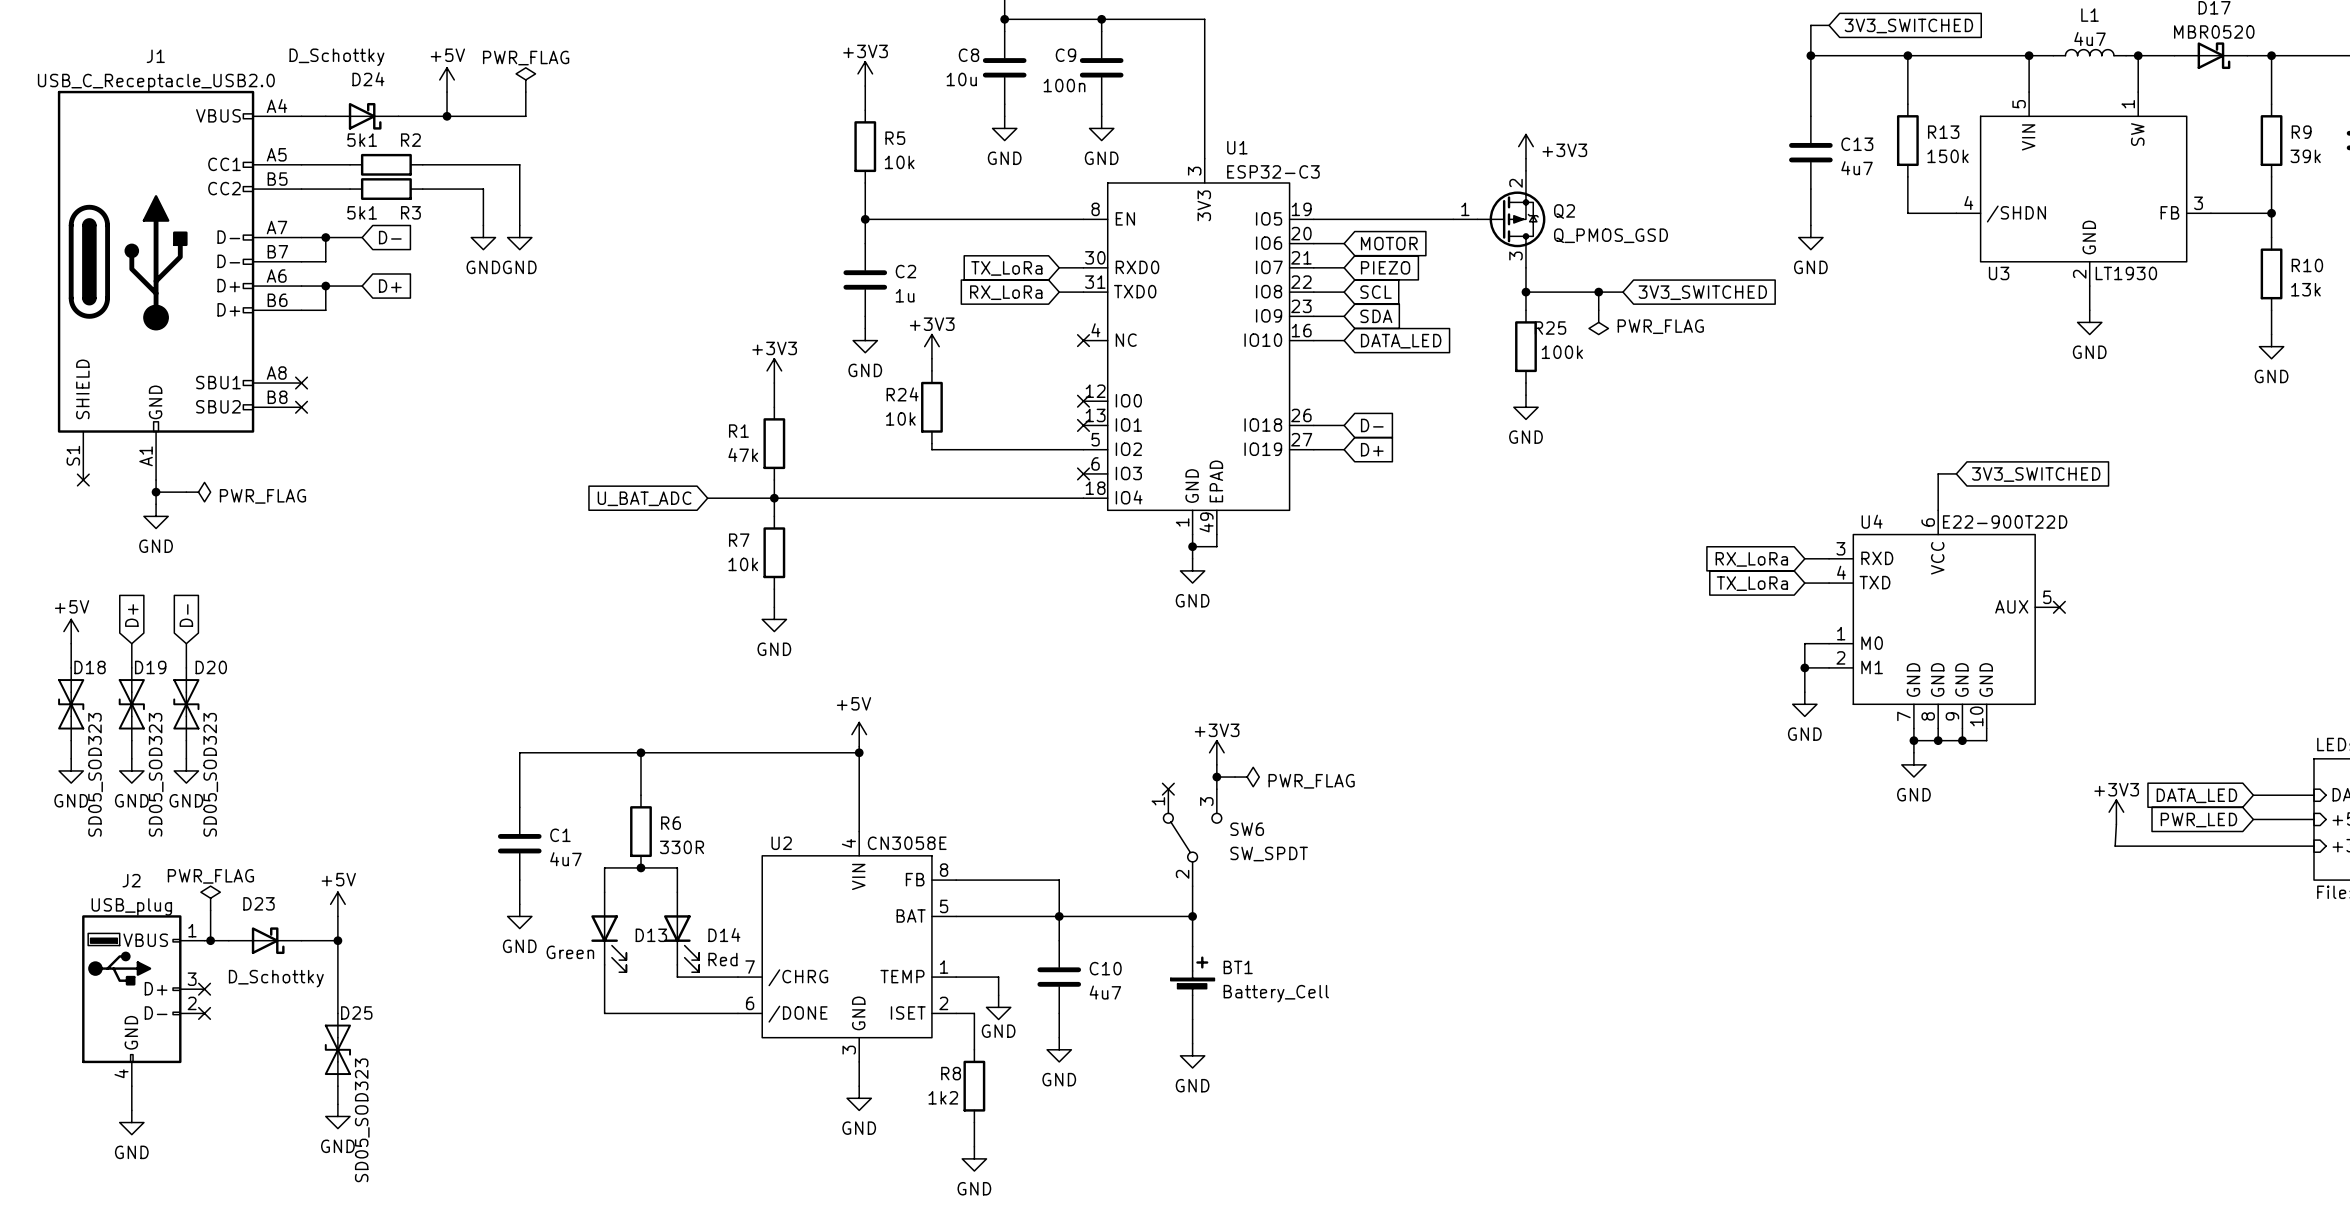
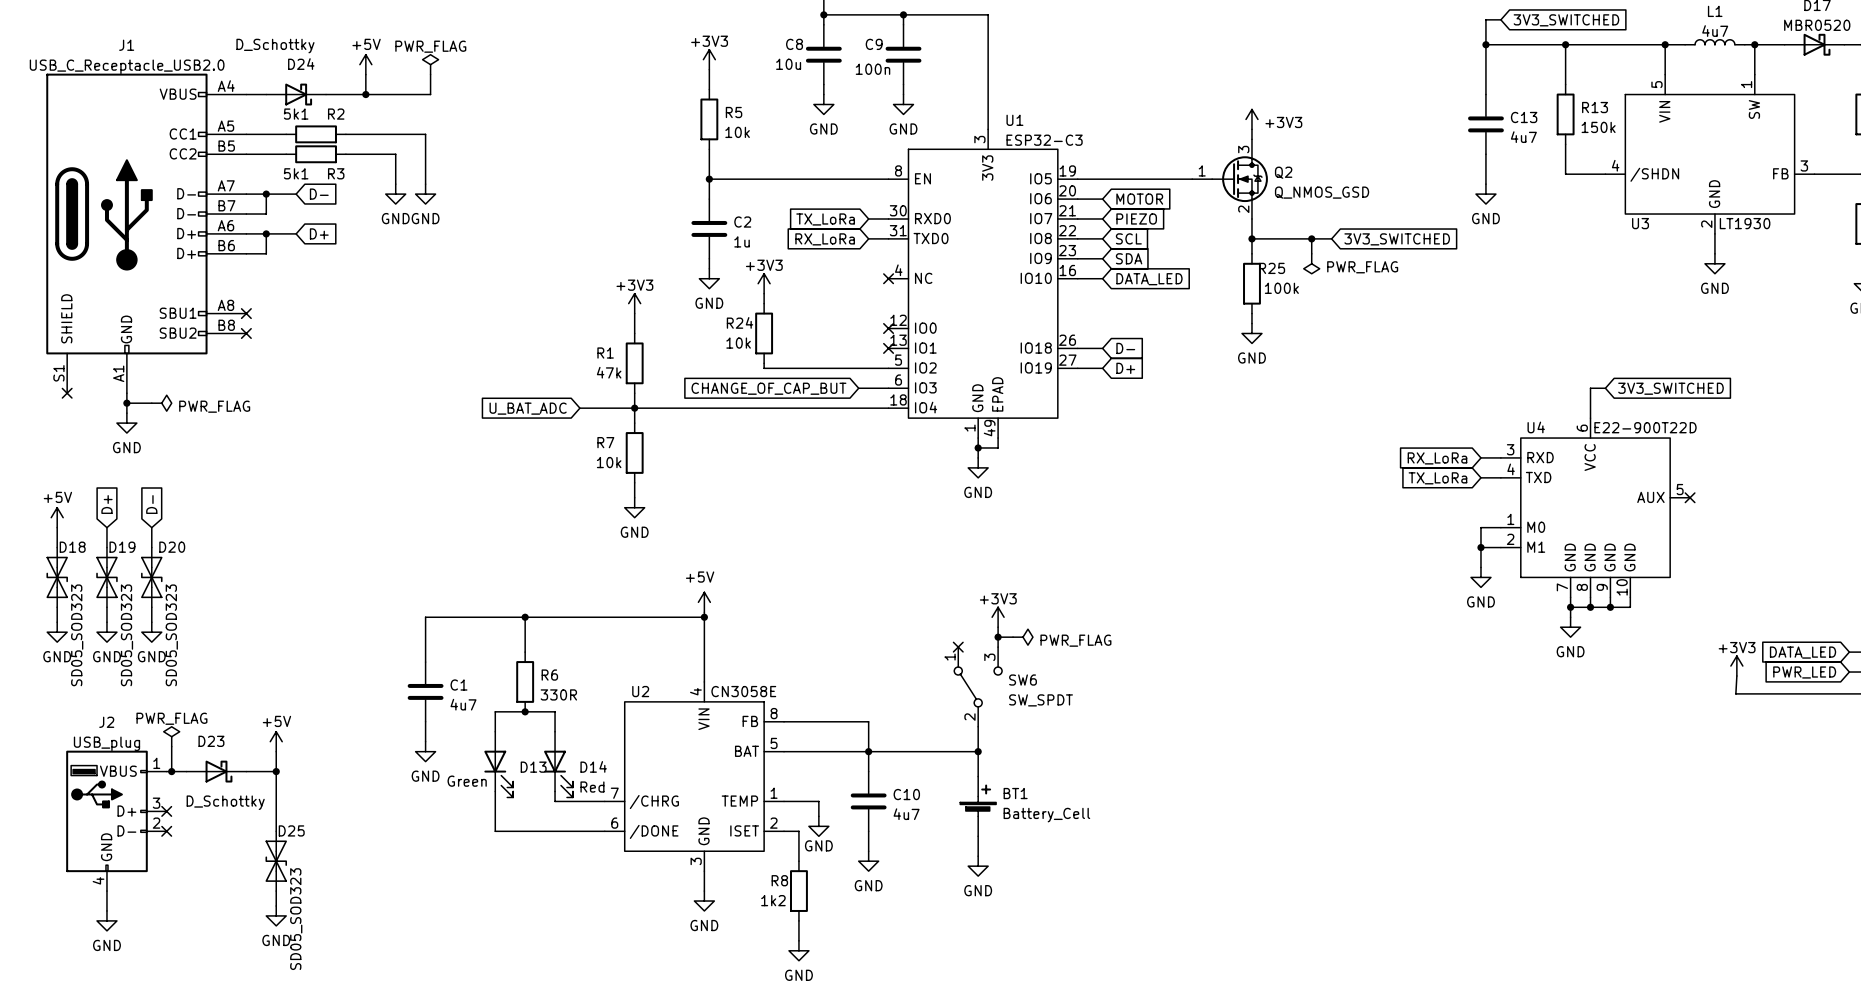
Q2 symbol: [1453, 170, 1546, 268] -> [1192, 139, 1268, 219]
Q2 value: Q_PMOS_GSD (1611, 235) -> Q_NMOS_GSD (1322, 192)
wire: none -> (858, 388) (888, 388)
no-connect mark: (1083, 473) -> none
global label: none -> CHANGE_OF_CAP_BUT (768, 388)

